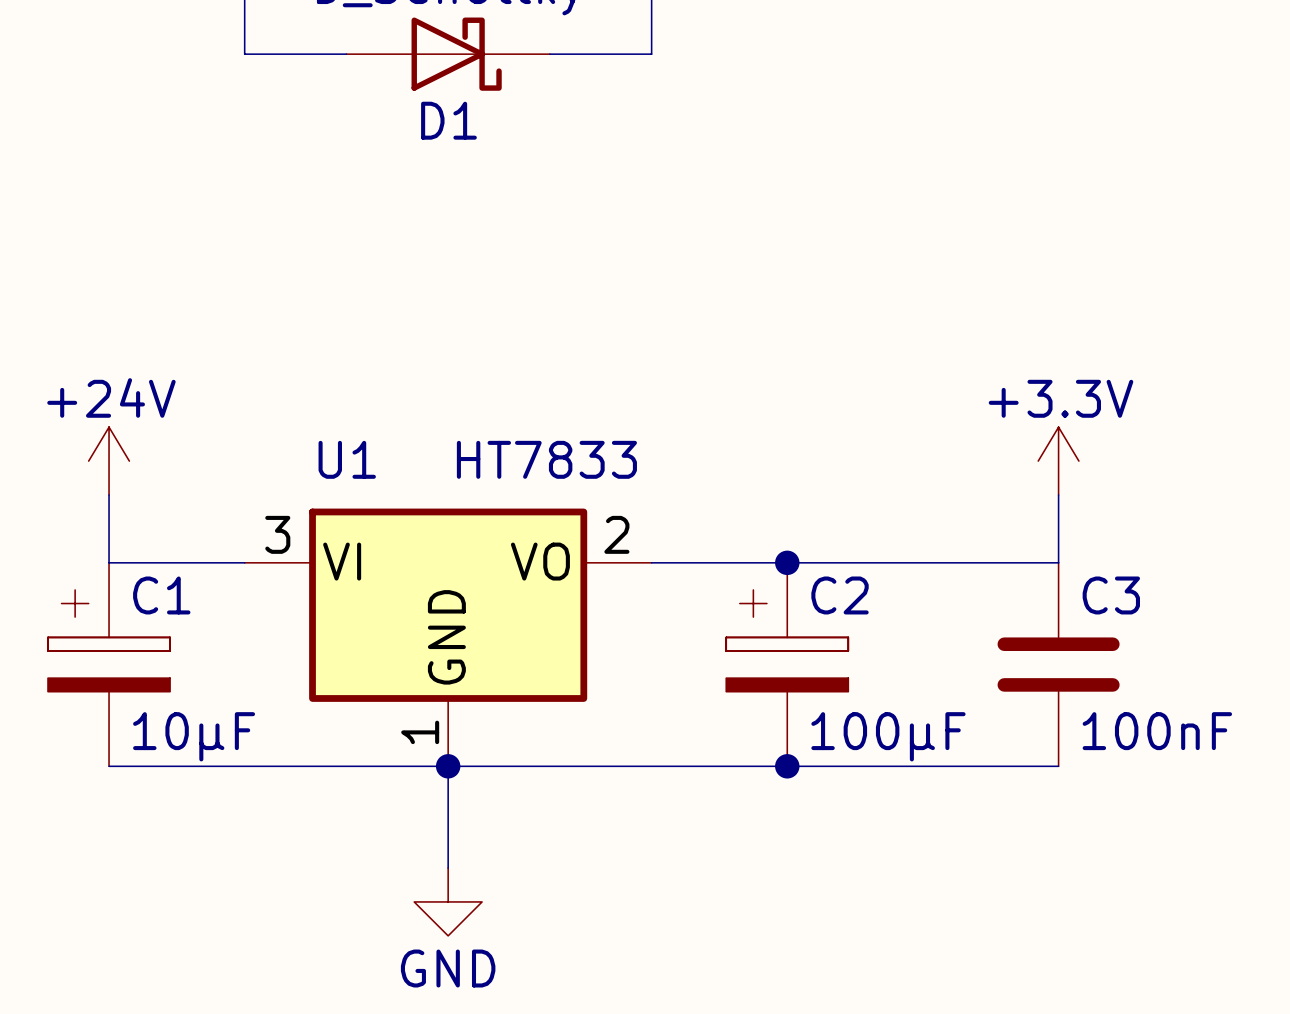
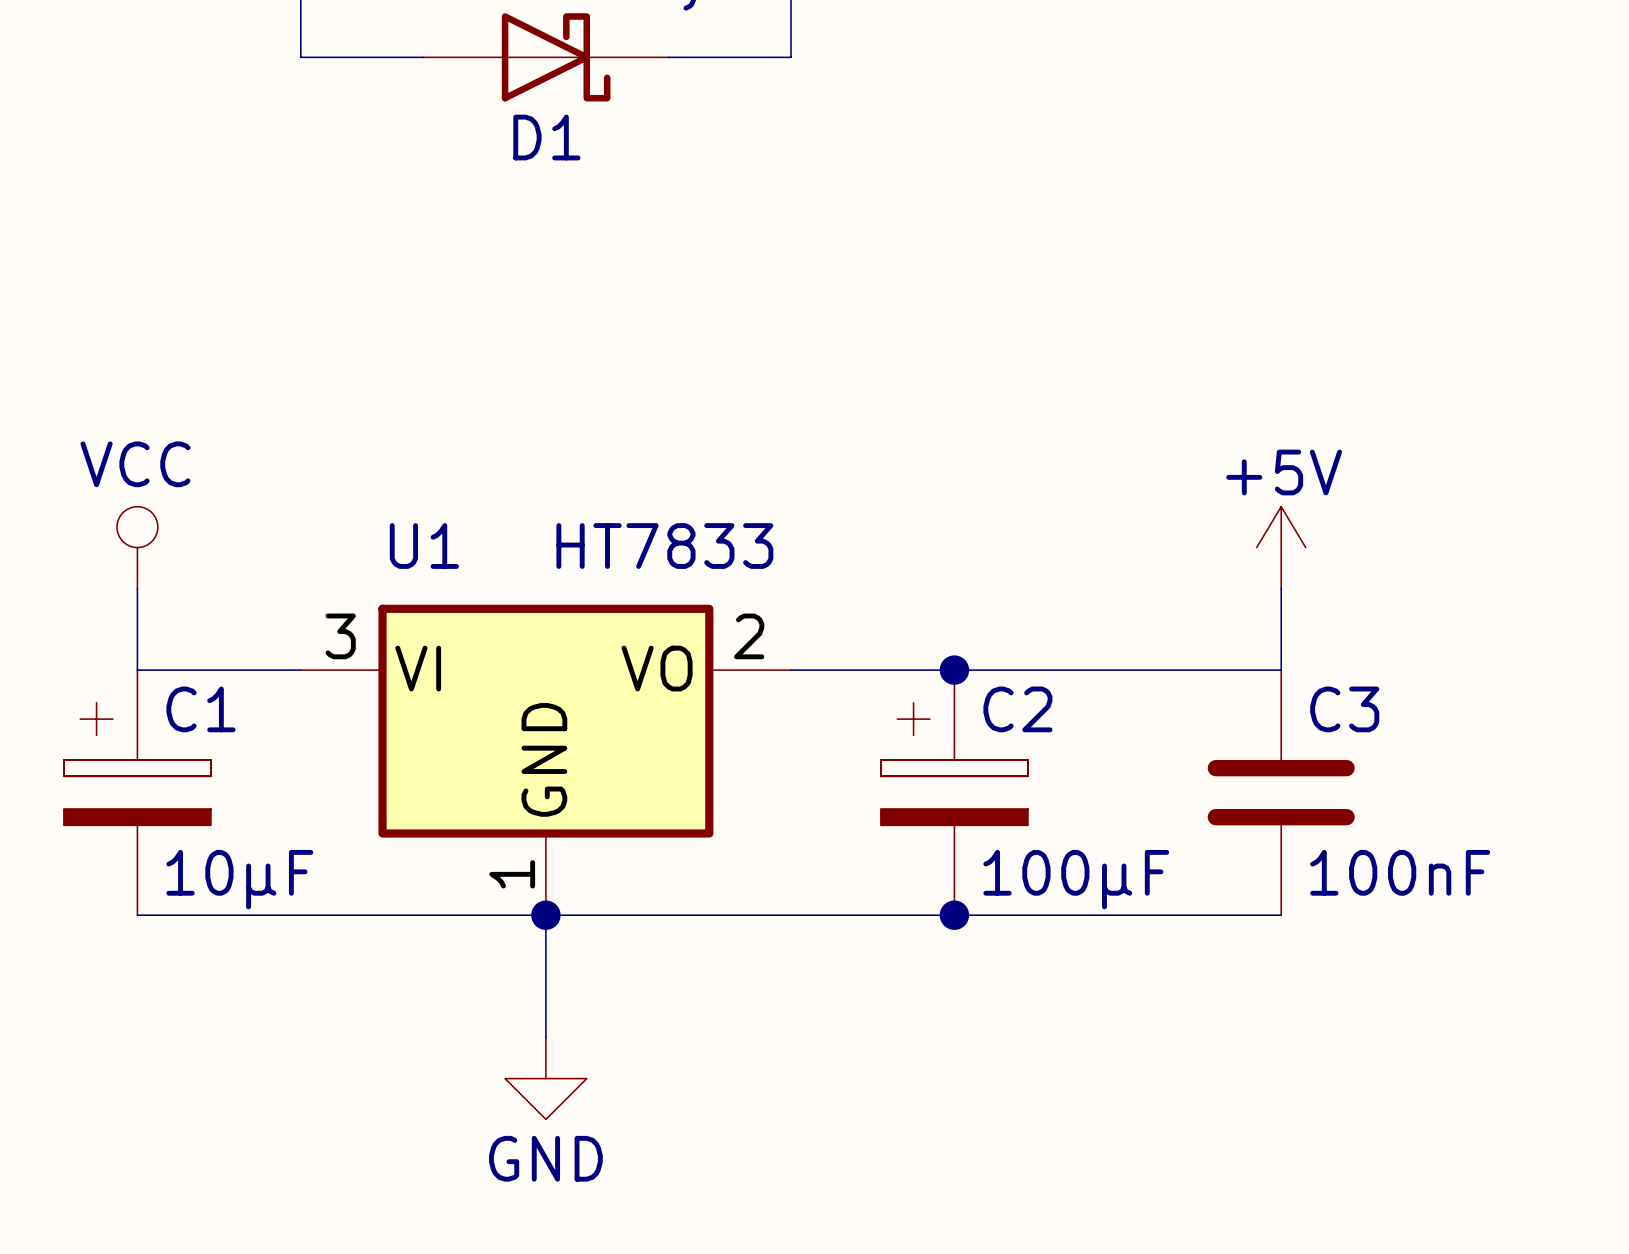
power symbol: +24V (109, 461) -> VCC (137, 547)
power symbol: +3.3V (1058, 461) -> +5V (1281, 547)

